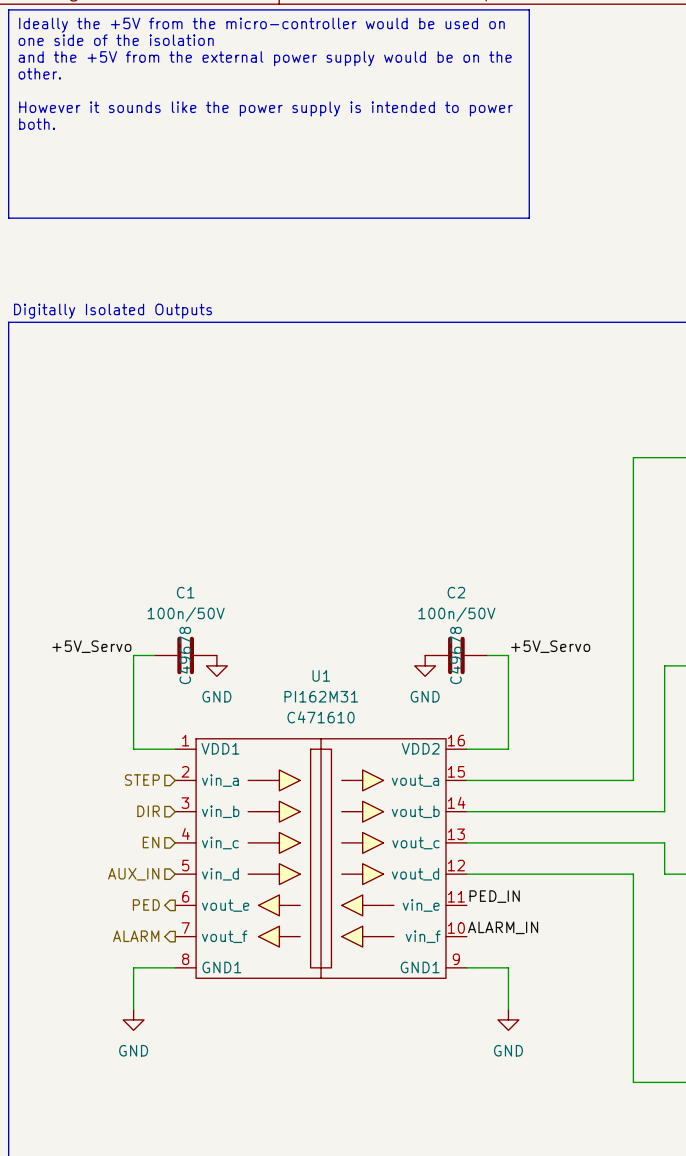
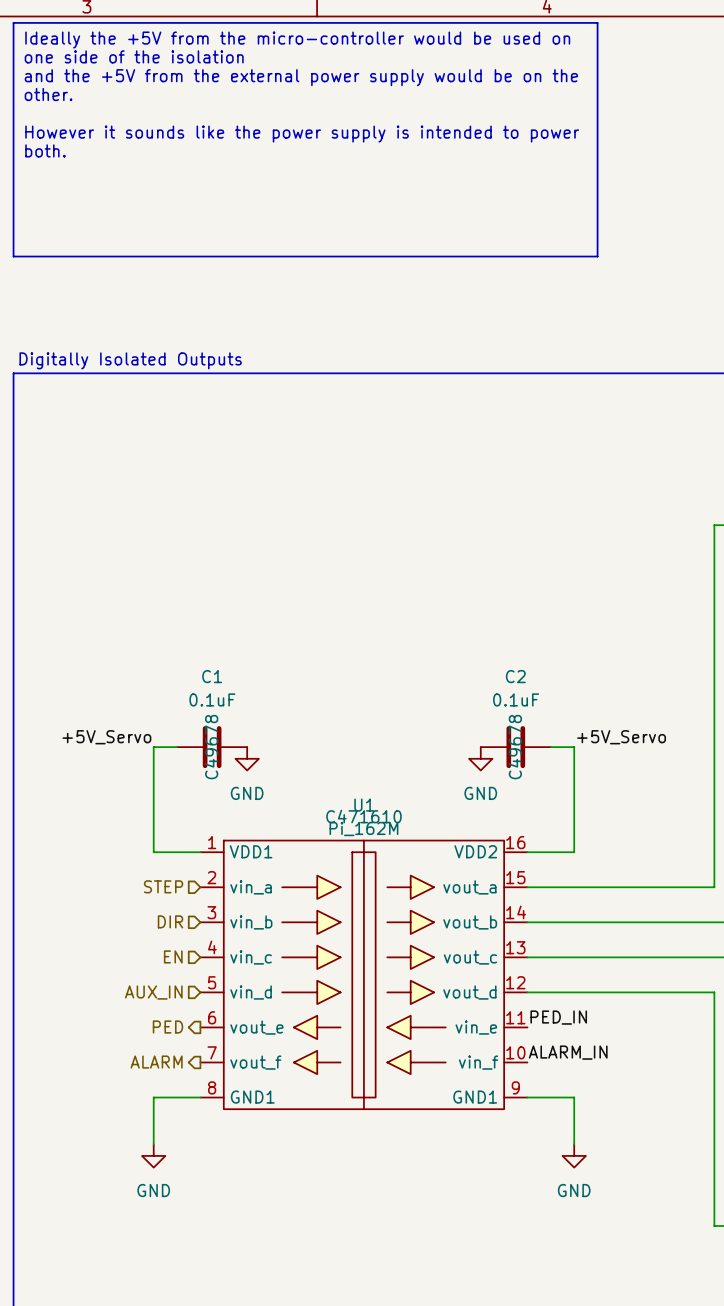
C1 value: 100n/50V (186, 614) -> 0.1uF (212, 699)
C2 value: 100n/50V (456, 614) -> 0.1uF (516, 699)
U1 name position: U1 (321, 675) -> U1 (364, 805)
U1 value: PI162M31 (321, 696) -> Pi_162M (363, 828)

